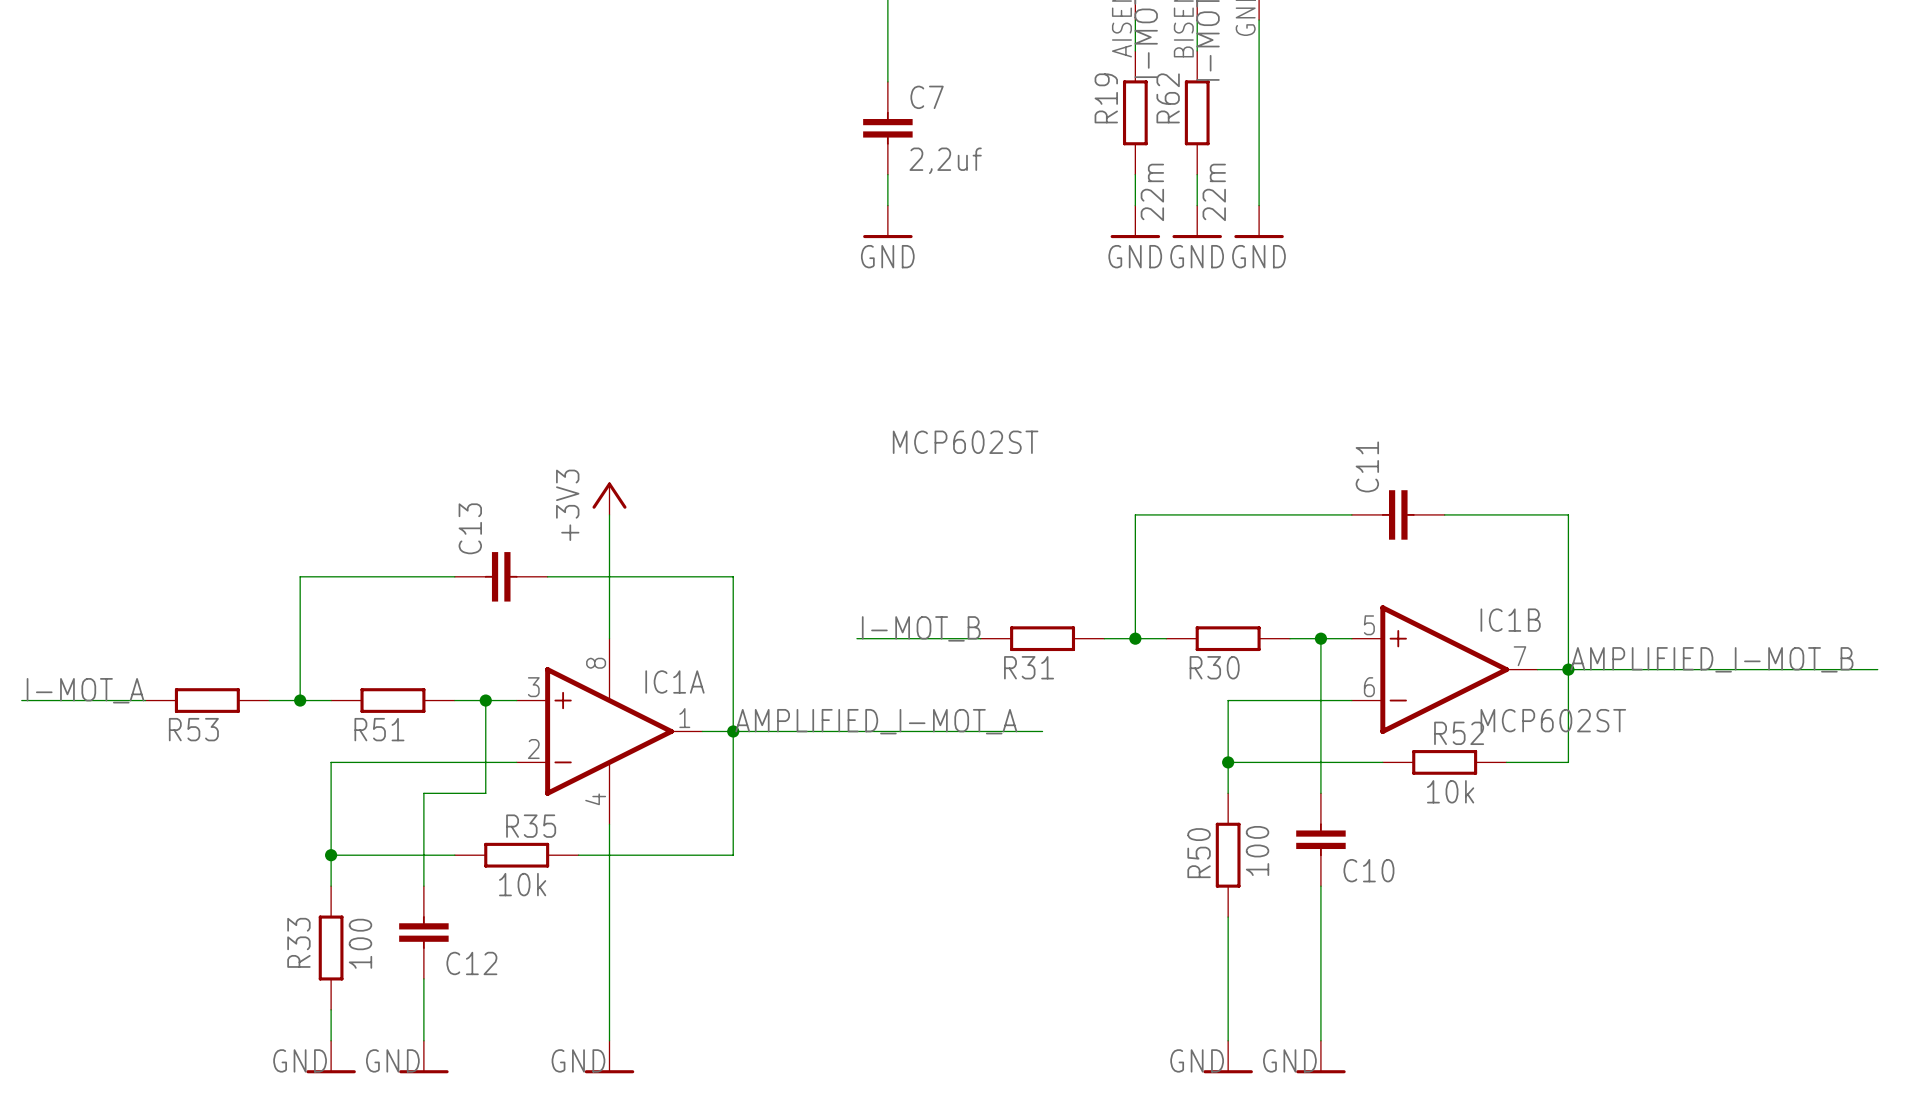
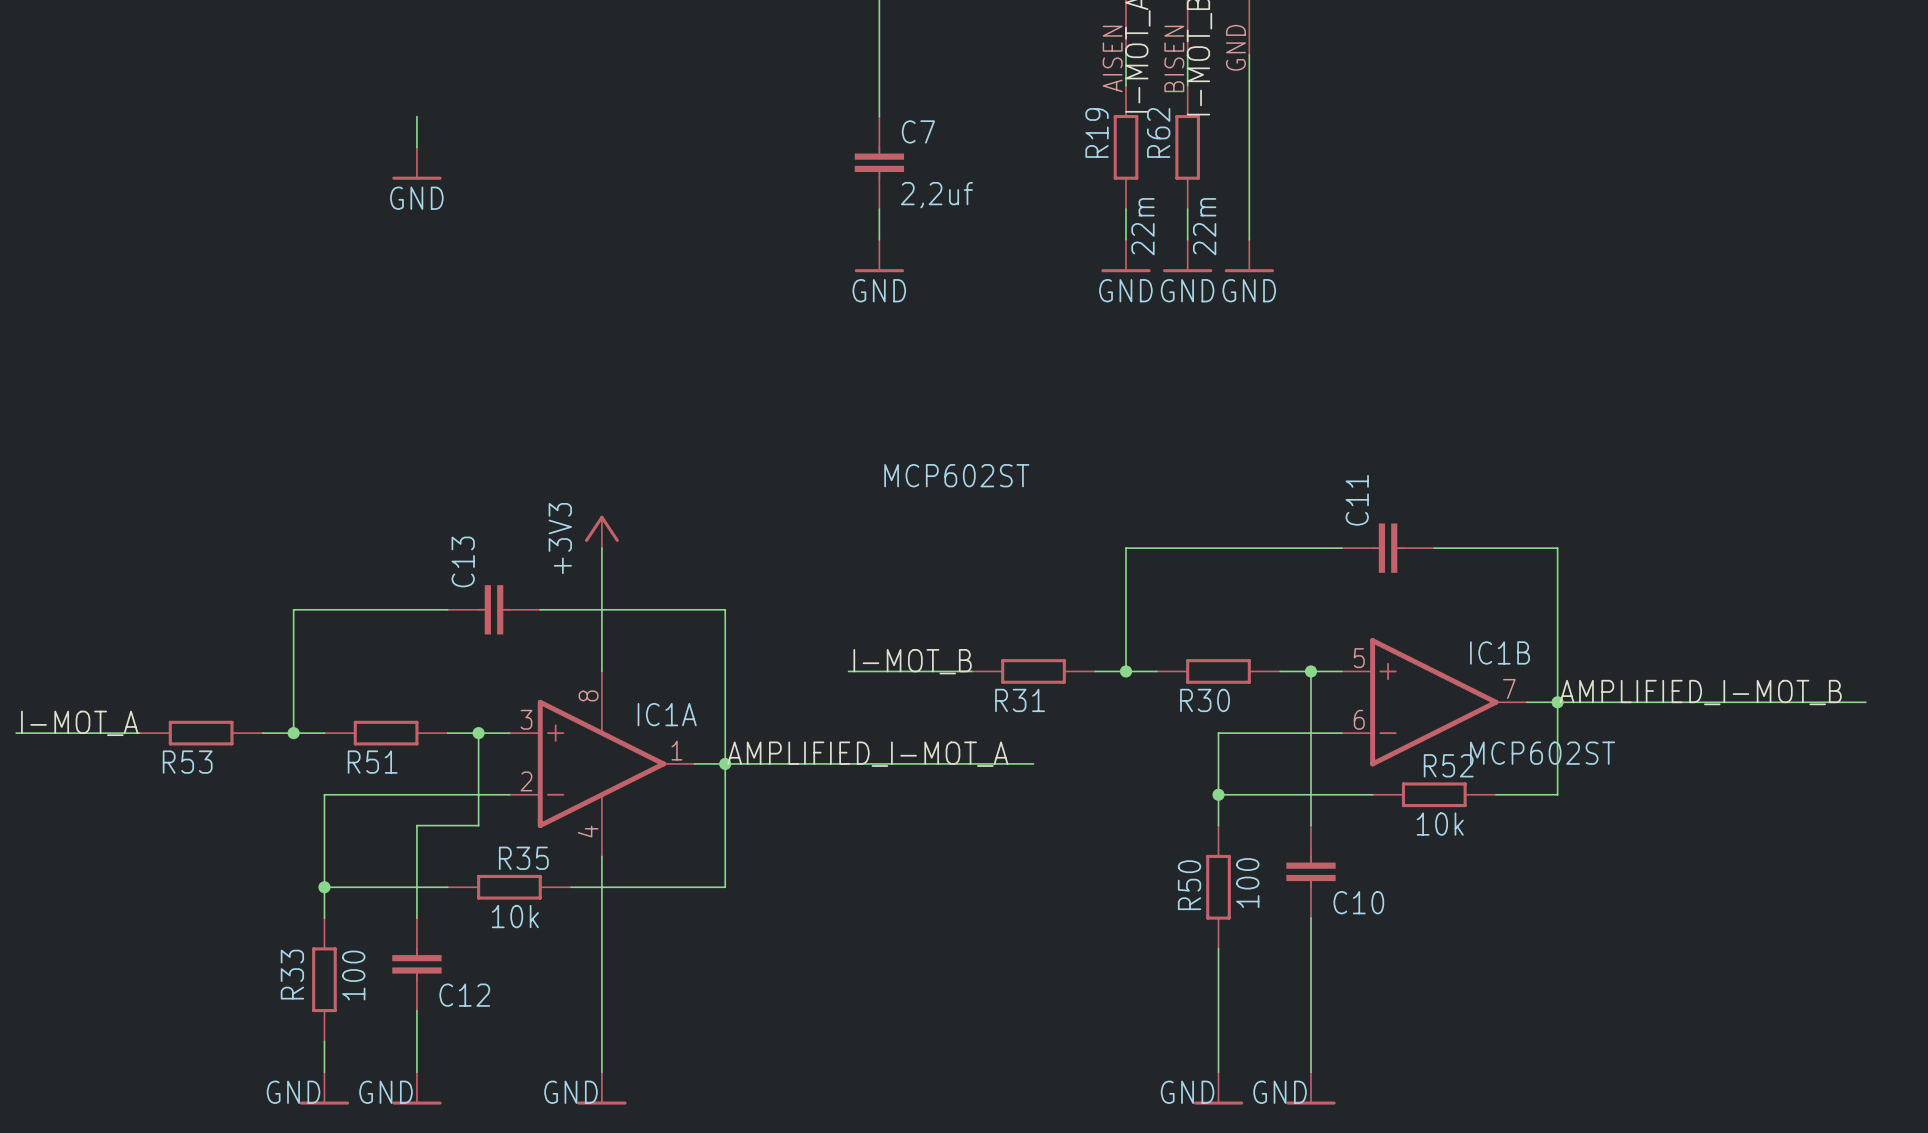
wire: none -> (416, 116) (416, 147)
power symbol: none -> GND (416, 163)

